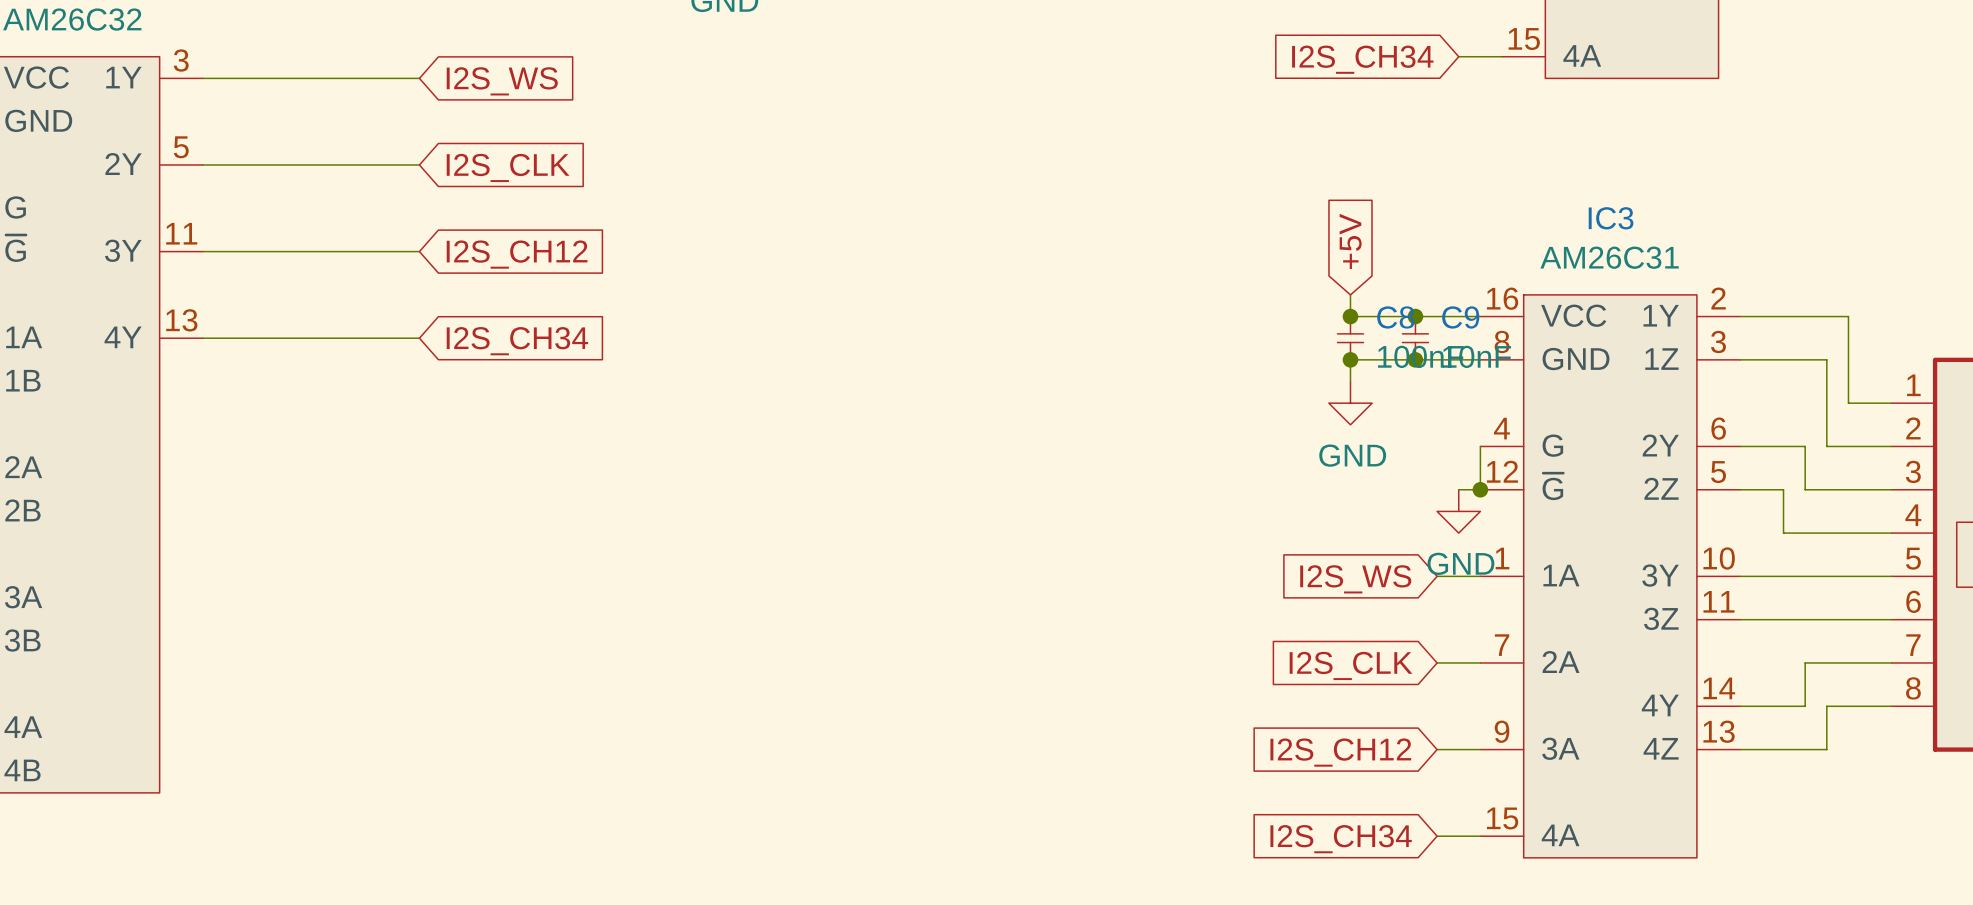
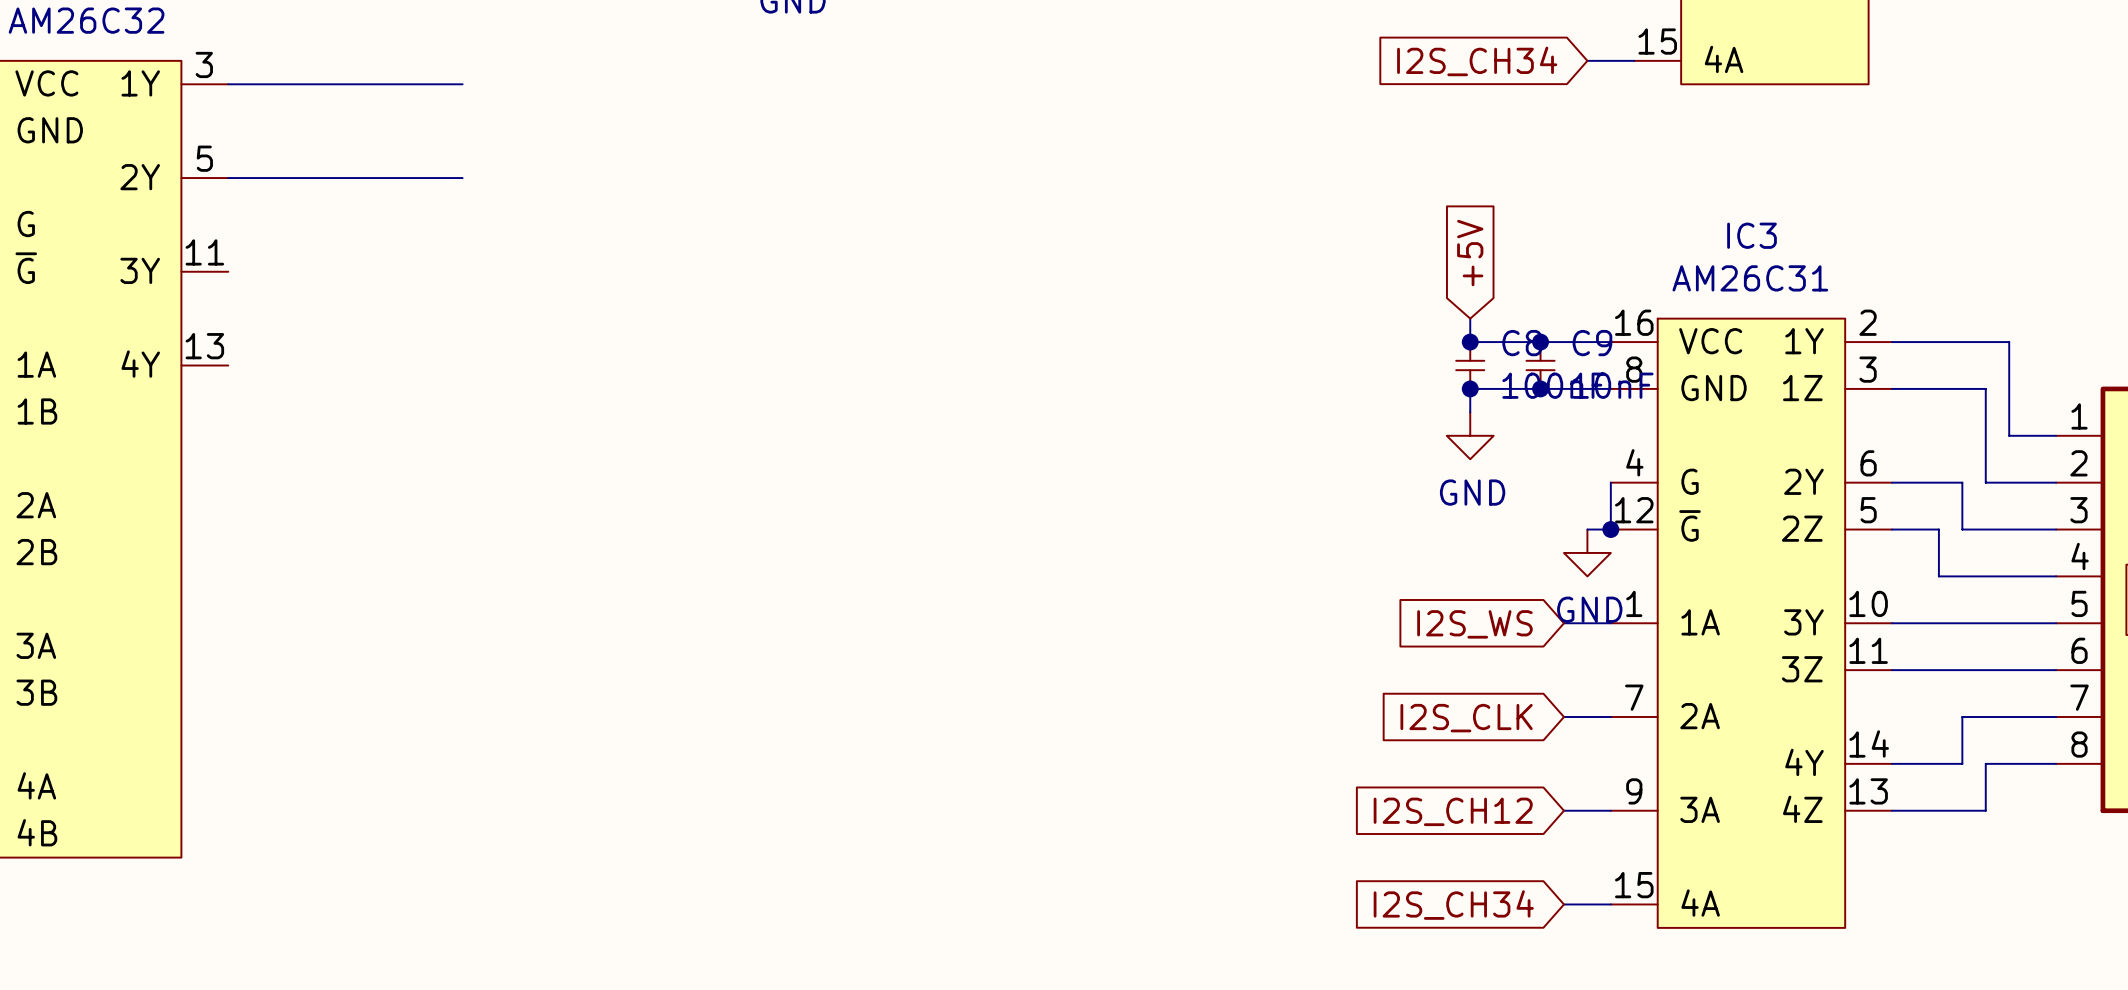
global label: I2S_WS (502, 81) -> none
global label: I2S_CLK (508, 167) -> none
wire: (202, 251) (419, 251) -> none
global label: I2S_CH12 (517, 254) -> none
wire: (202, 338) (419, 338) -> none
global label: I2S_CH34 (517, 341) -> none

